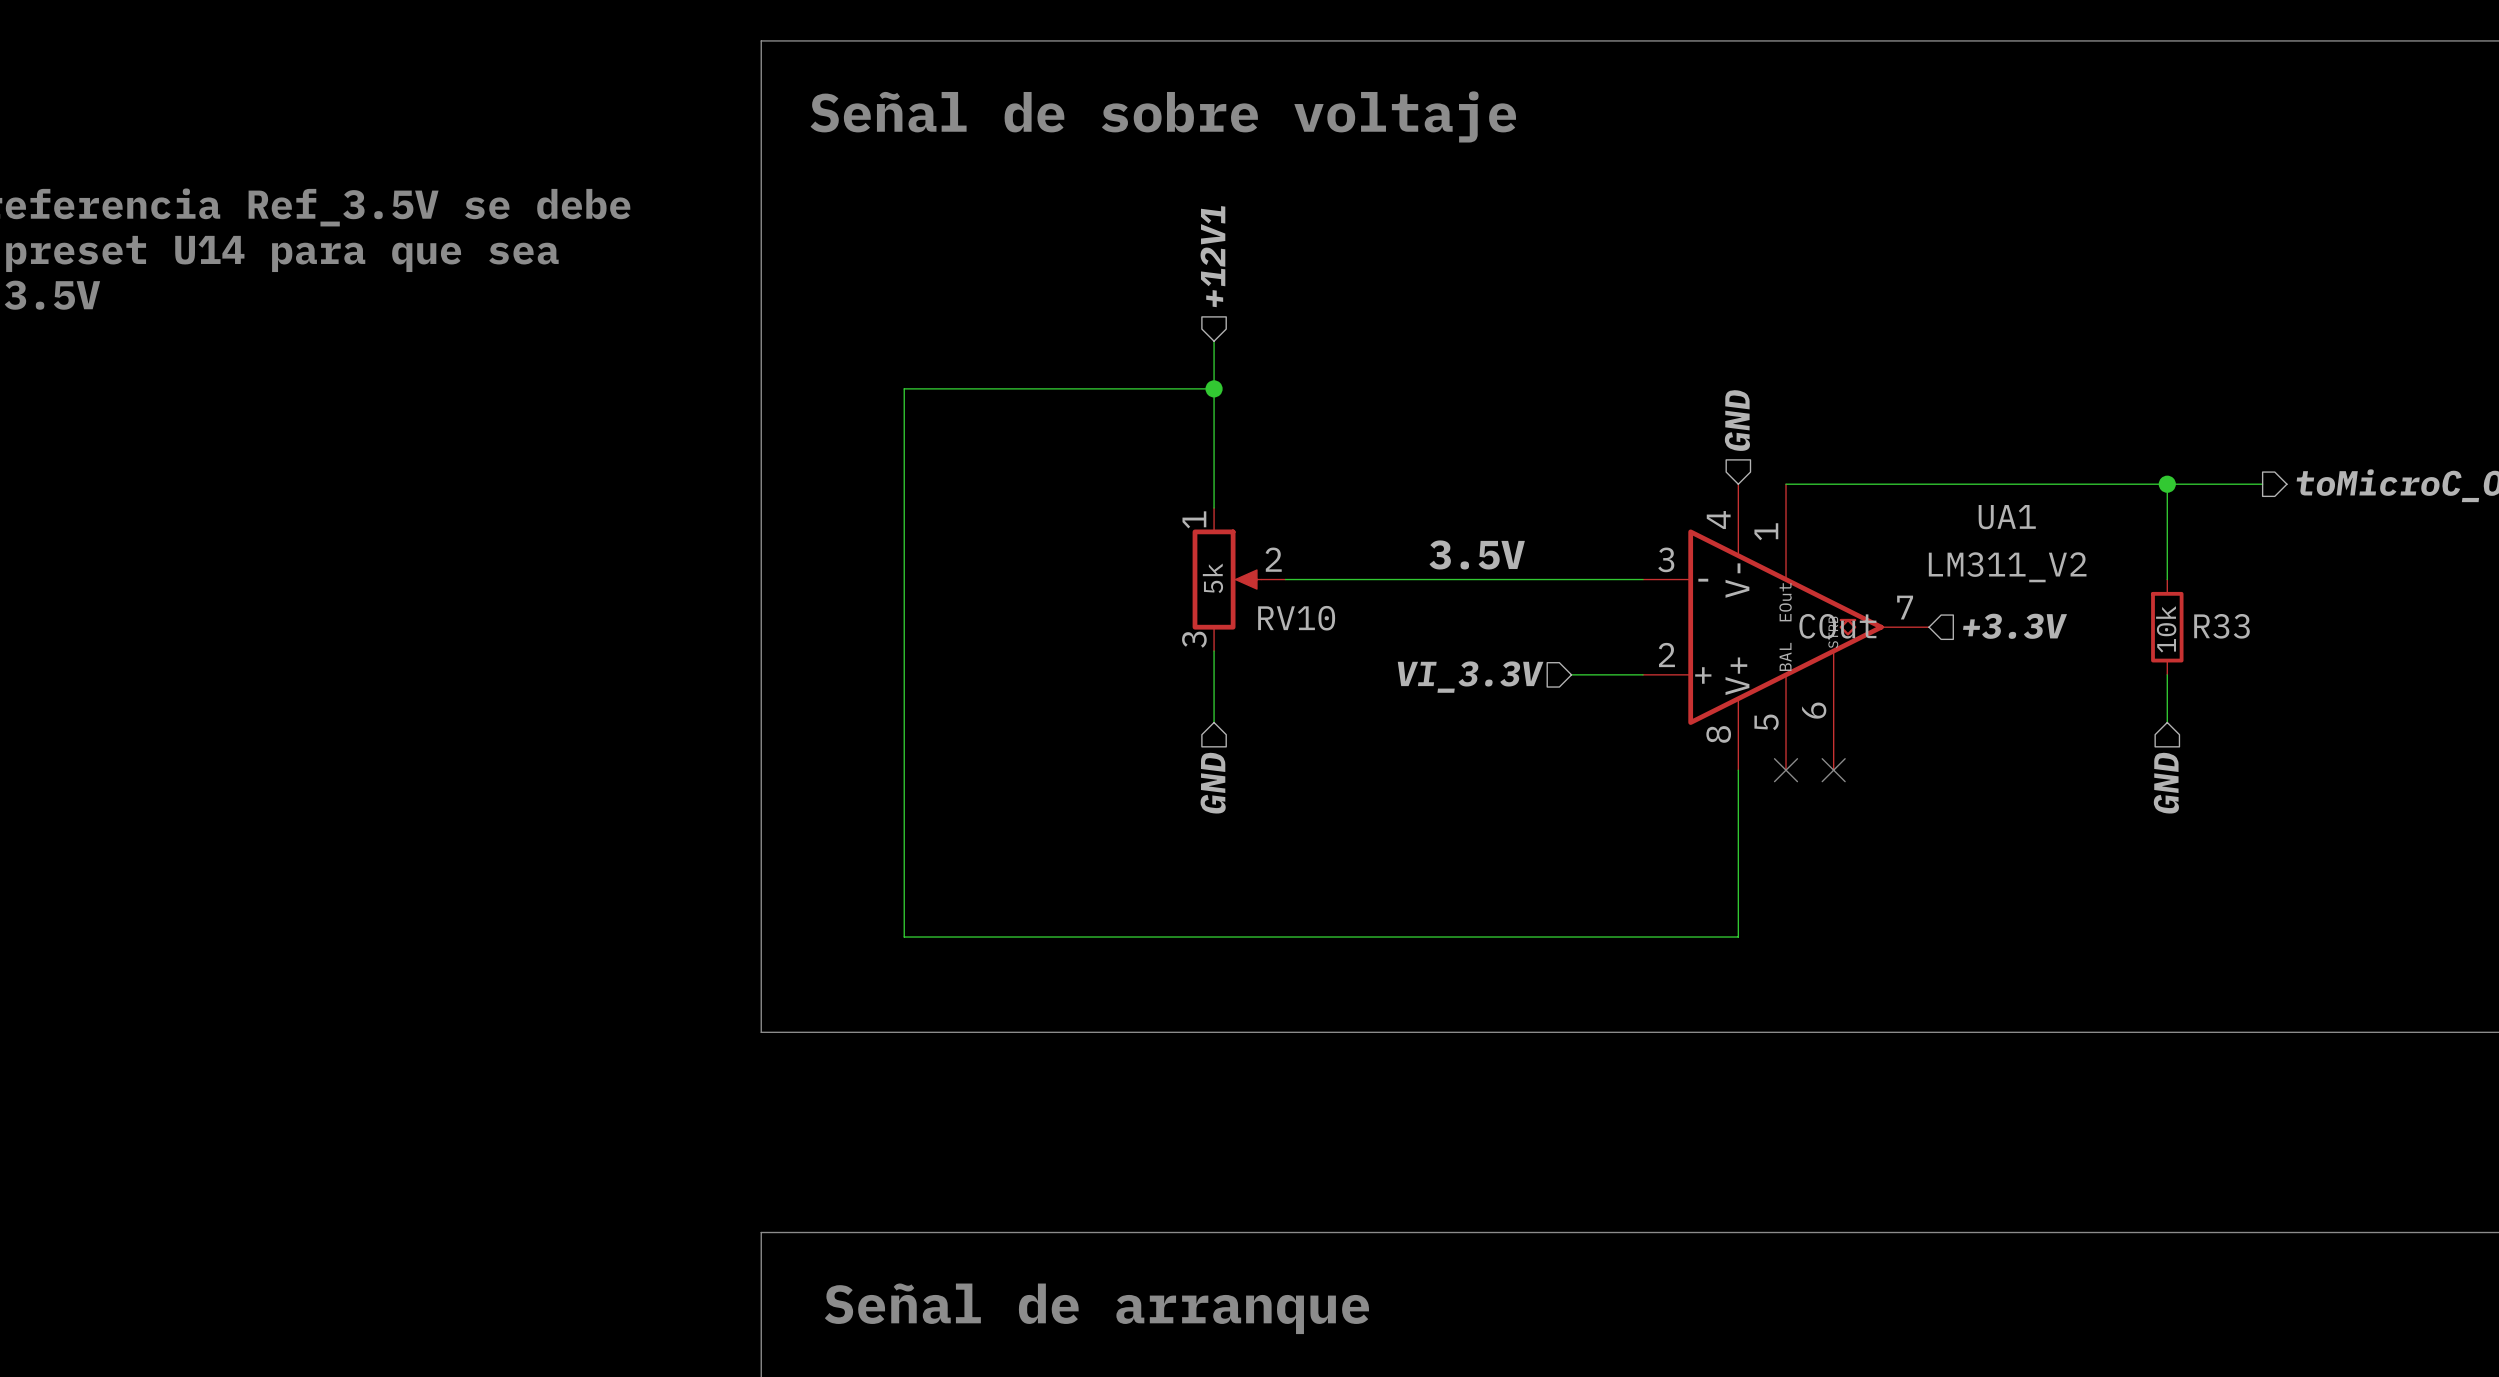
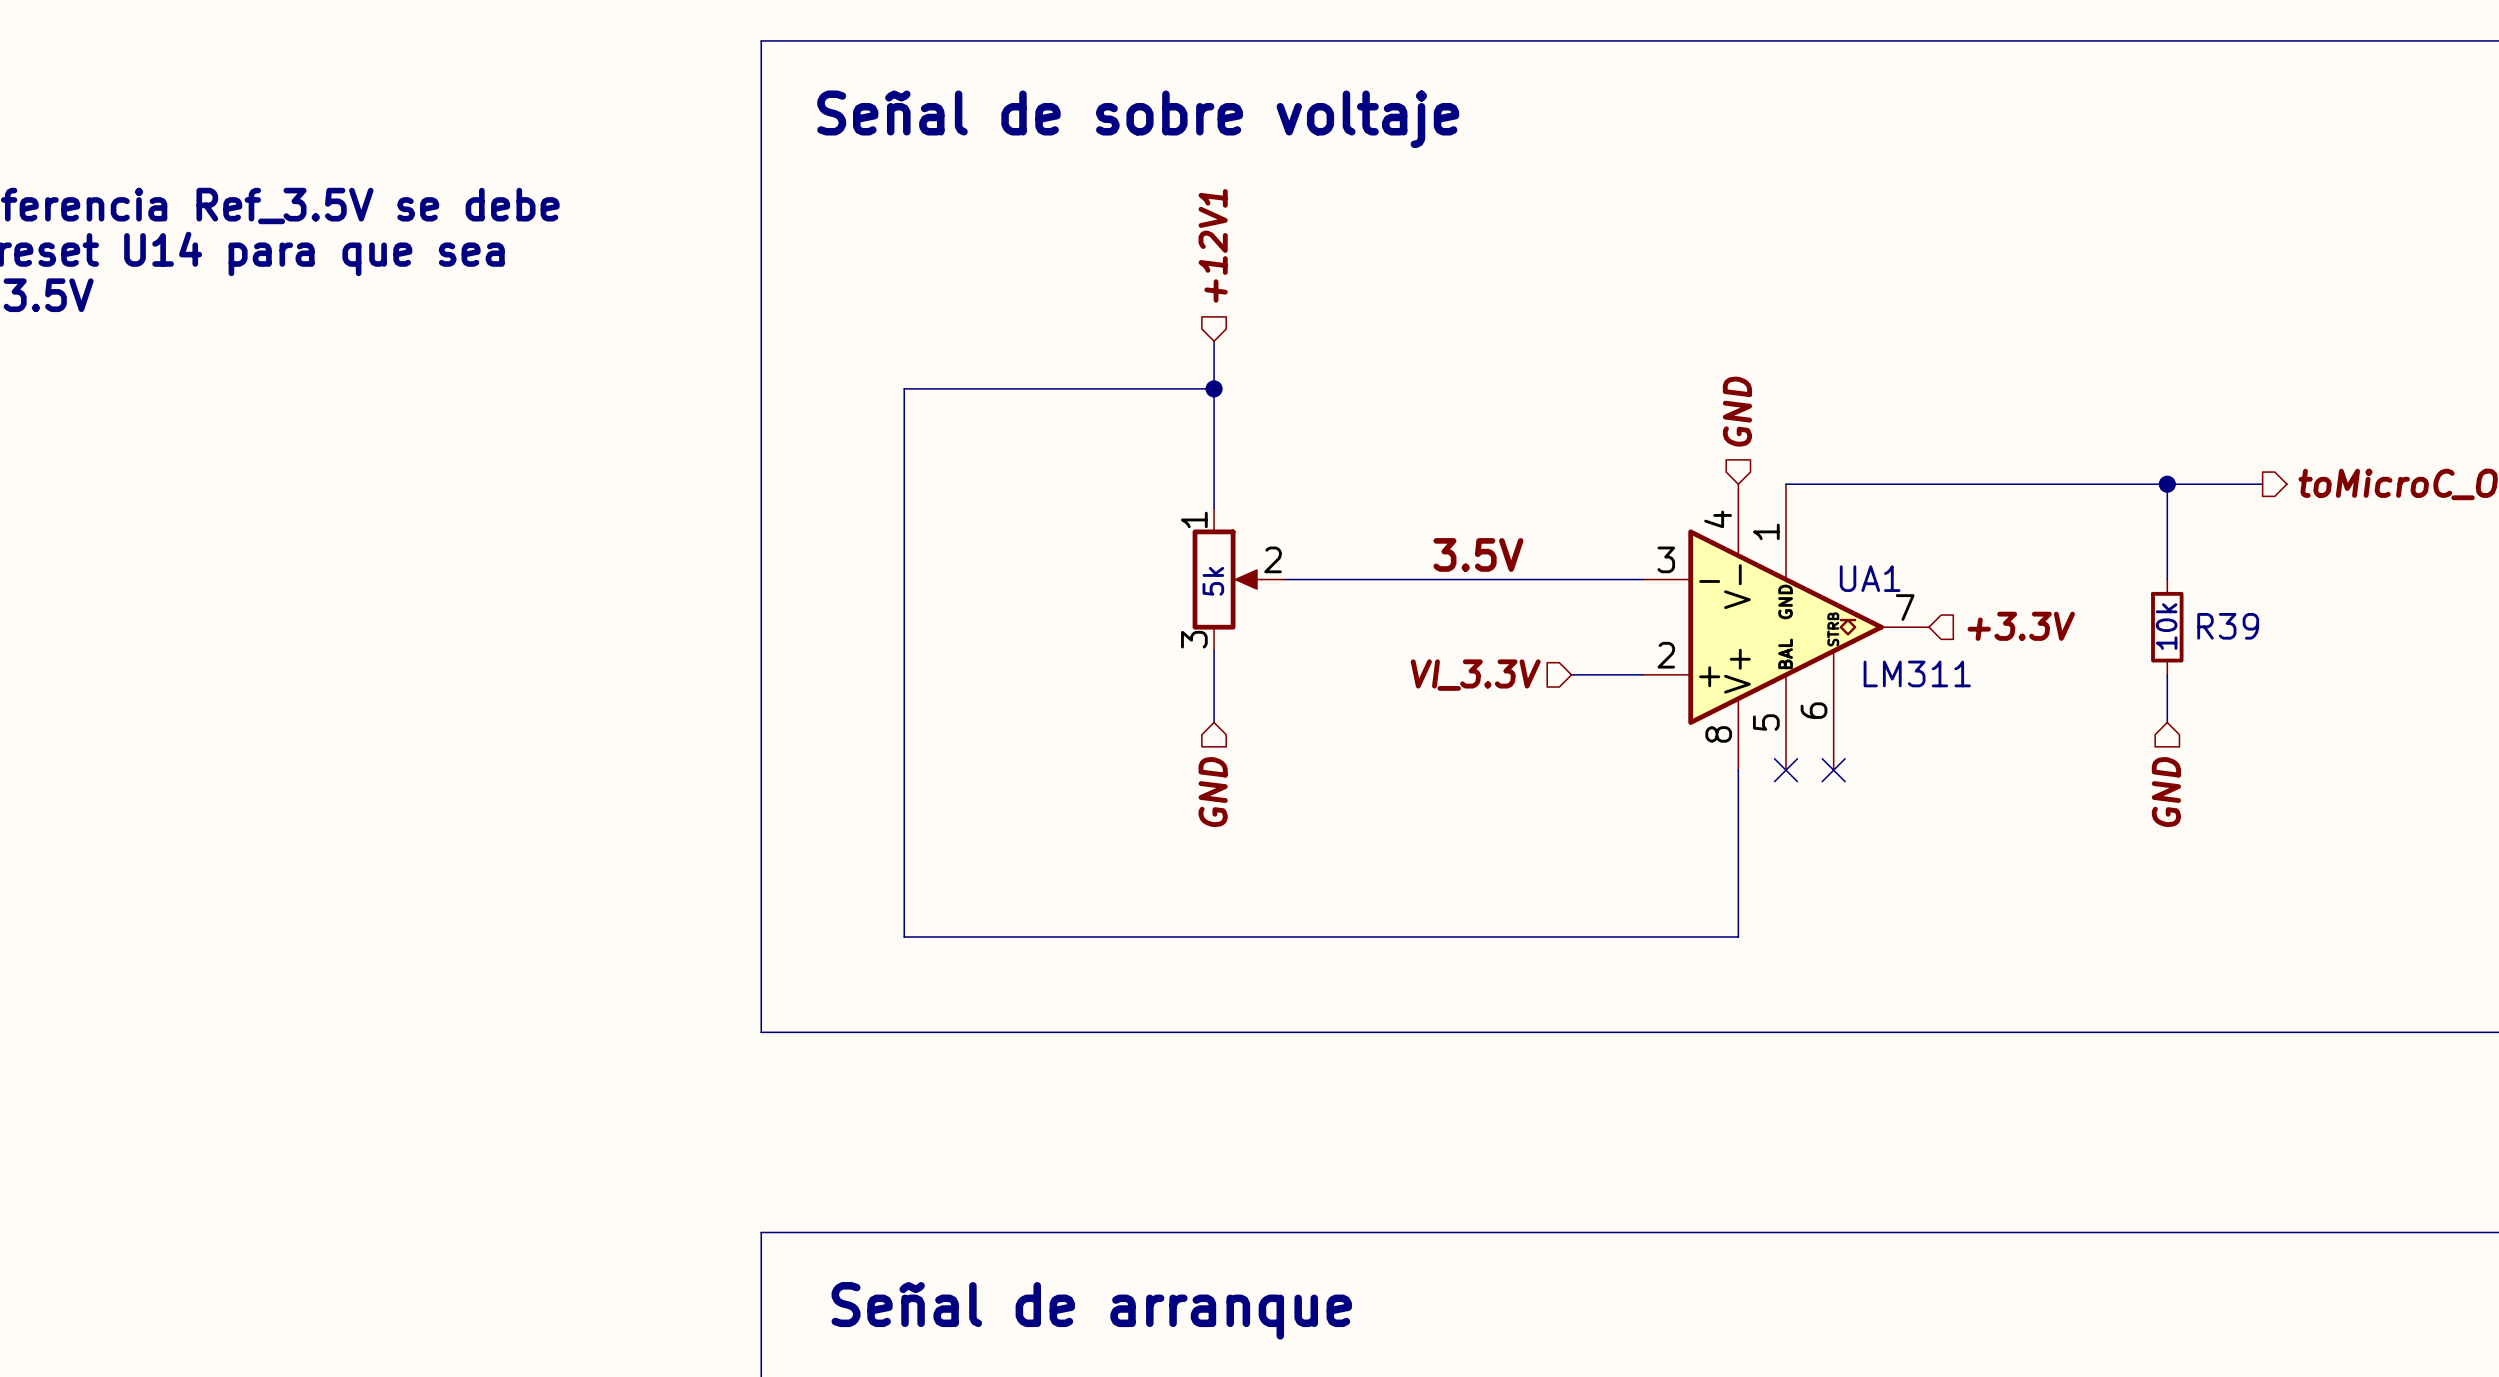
UA1 name position: UA1 (2007, 517) -> UA1 (1870, 578)
UA1 value: LM311_V2 (2007, 567) -> LM311 (1917, 673)
UA1 pin name: EOut (1785, 602) -> GND (1785, 601)
RV10 name: RV10 (1296, 618) -> none
UA1 pin name: COut (1837, 626) -> none
R33 name: R33 (2222, 626) -> R39 (2228, 626)

